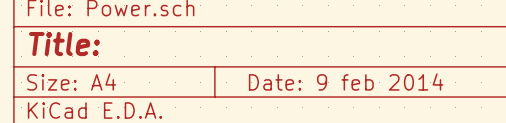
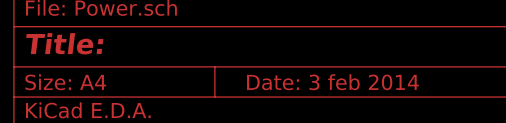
title block: Date: 9 feb 2014 (346, 82) -> Date: 3 feb 2014 (332, 82)

